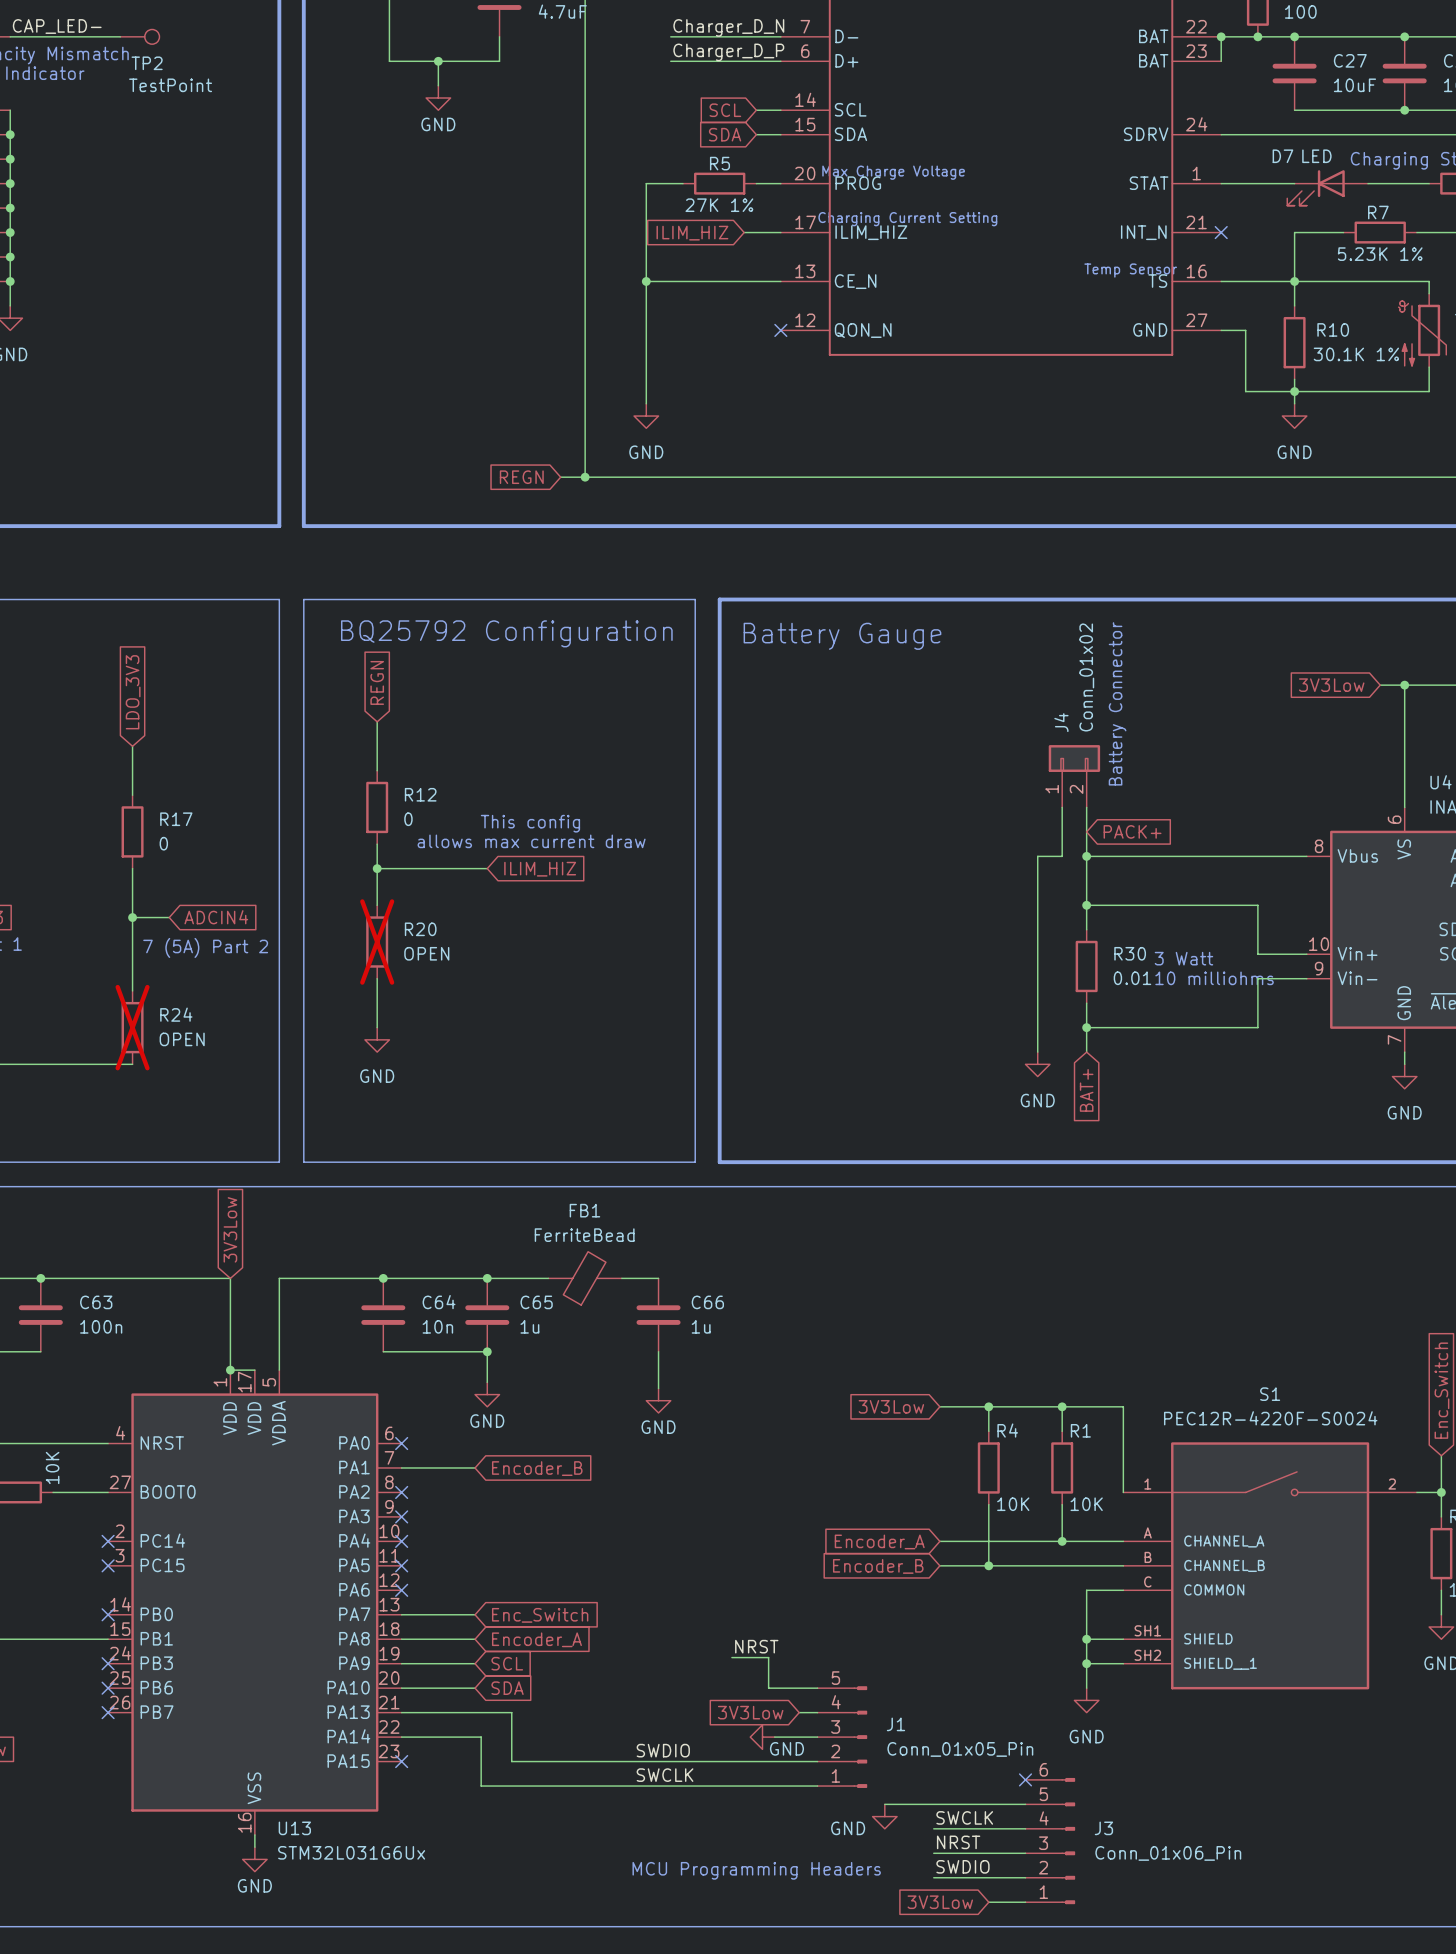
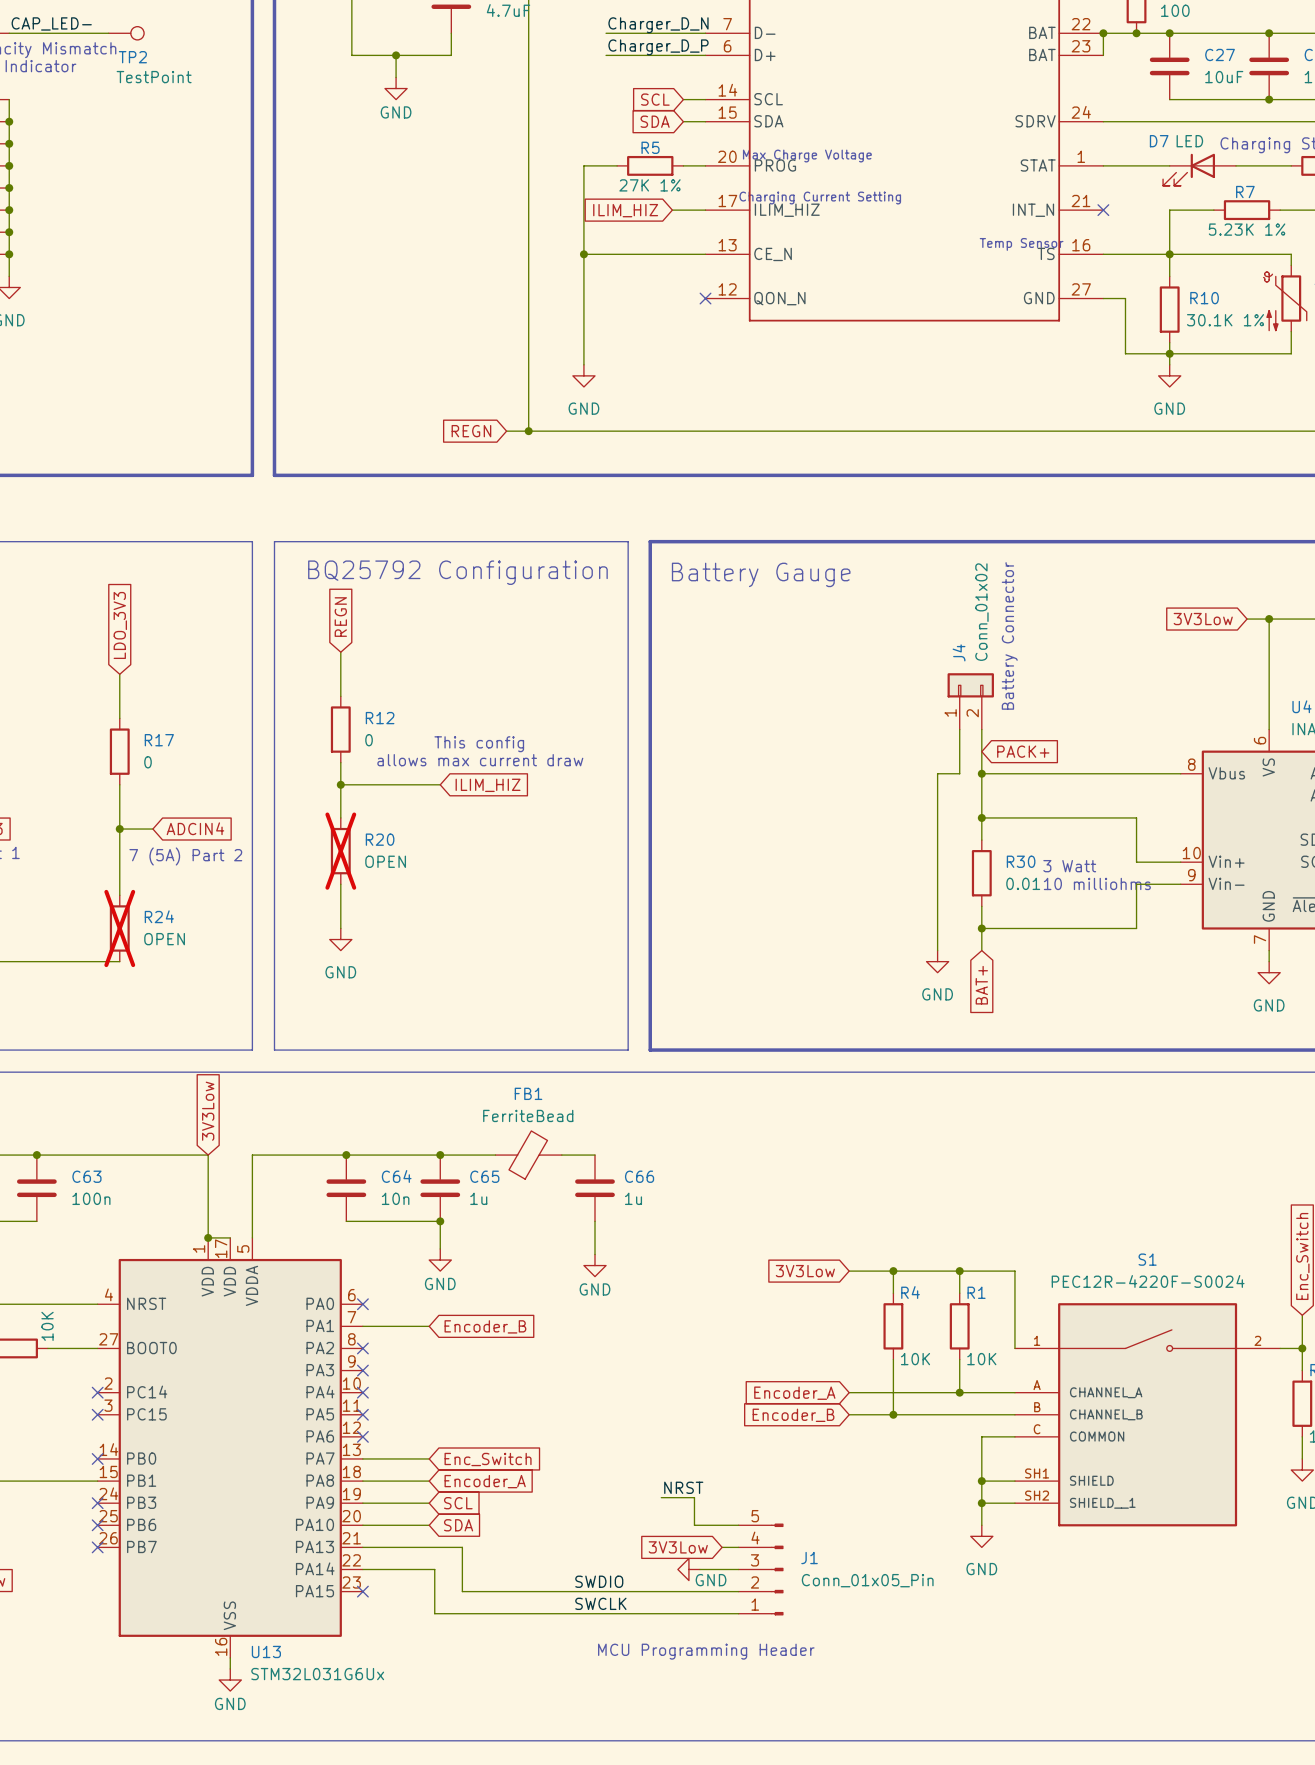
no-connect mark: (1025, 1779) -> none
wire: (884, 1804) (1025, 1804) -> none
power symbol: GND (884, 1816) -> none
label: SWCLK (964, 1817) -> none
text: none -> MCU Programming Header (706, 1651)
wire: (933, 1828) (1025, 1828) -> none
J3: Conn_01x06_Pin (1050, 1841) -> none
label: NRST (958, 1842) -> none
wire: (933, 1853) (1025, 1853) -> none
label: SWDIO (962, 1866) -> none
text: MCU Programming Headers (756, 1870) -> none
wire: (933, 1877) (1025, 1877) -> none
global label: 3V3Low (940, 1902) -> none
wire: (988, 1902) (1025, 1902) -> none

